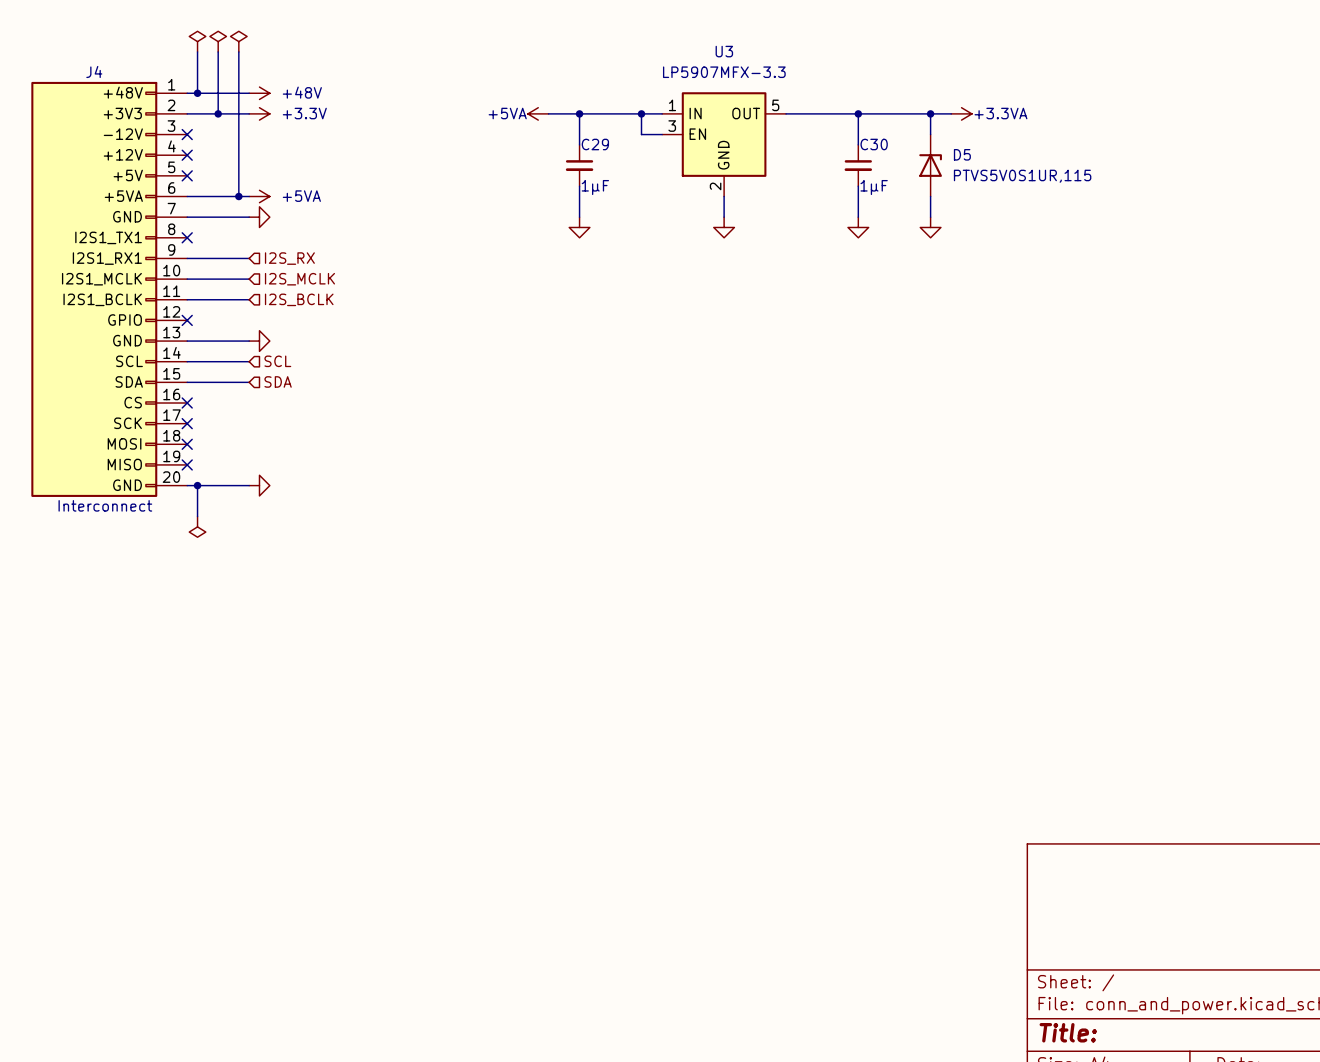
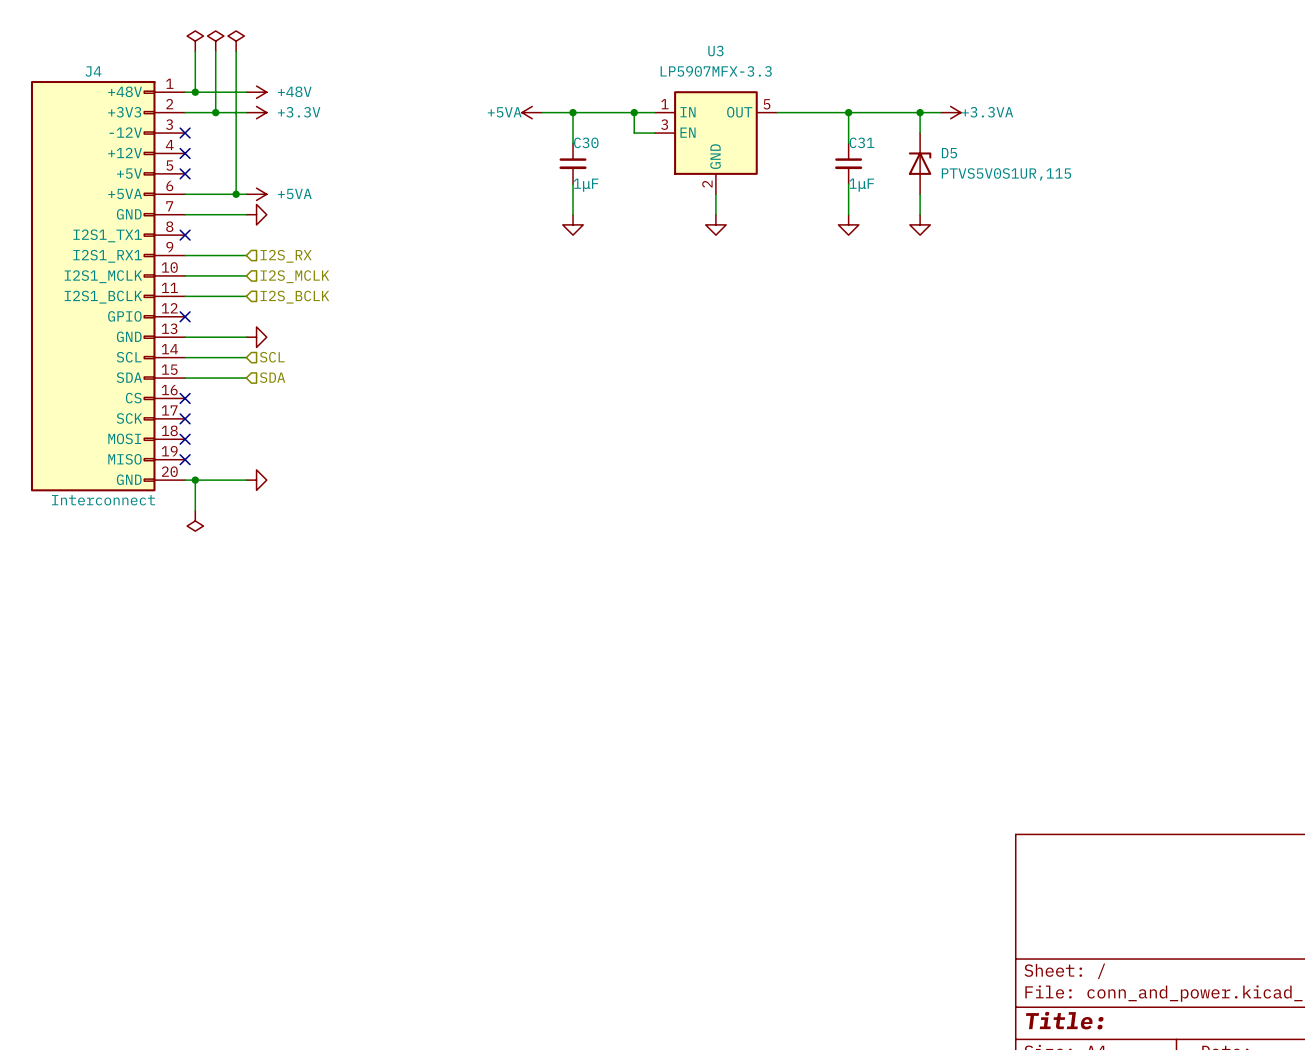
C29 name: C29 (595, 144) -> C30 (586, 142)
C30 name: C30 (874, 144) -> C31 (861, 142)

